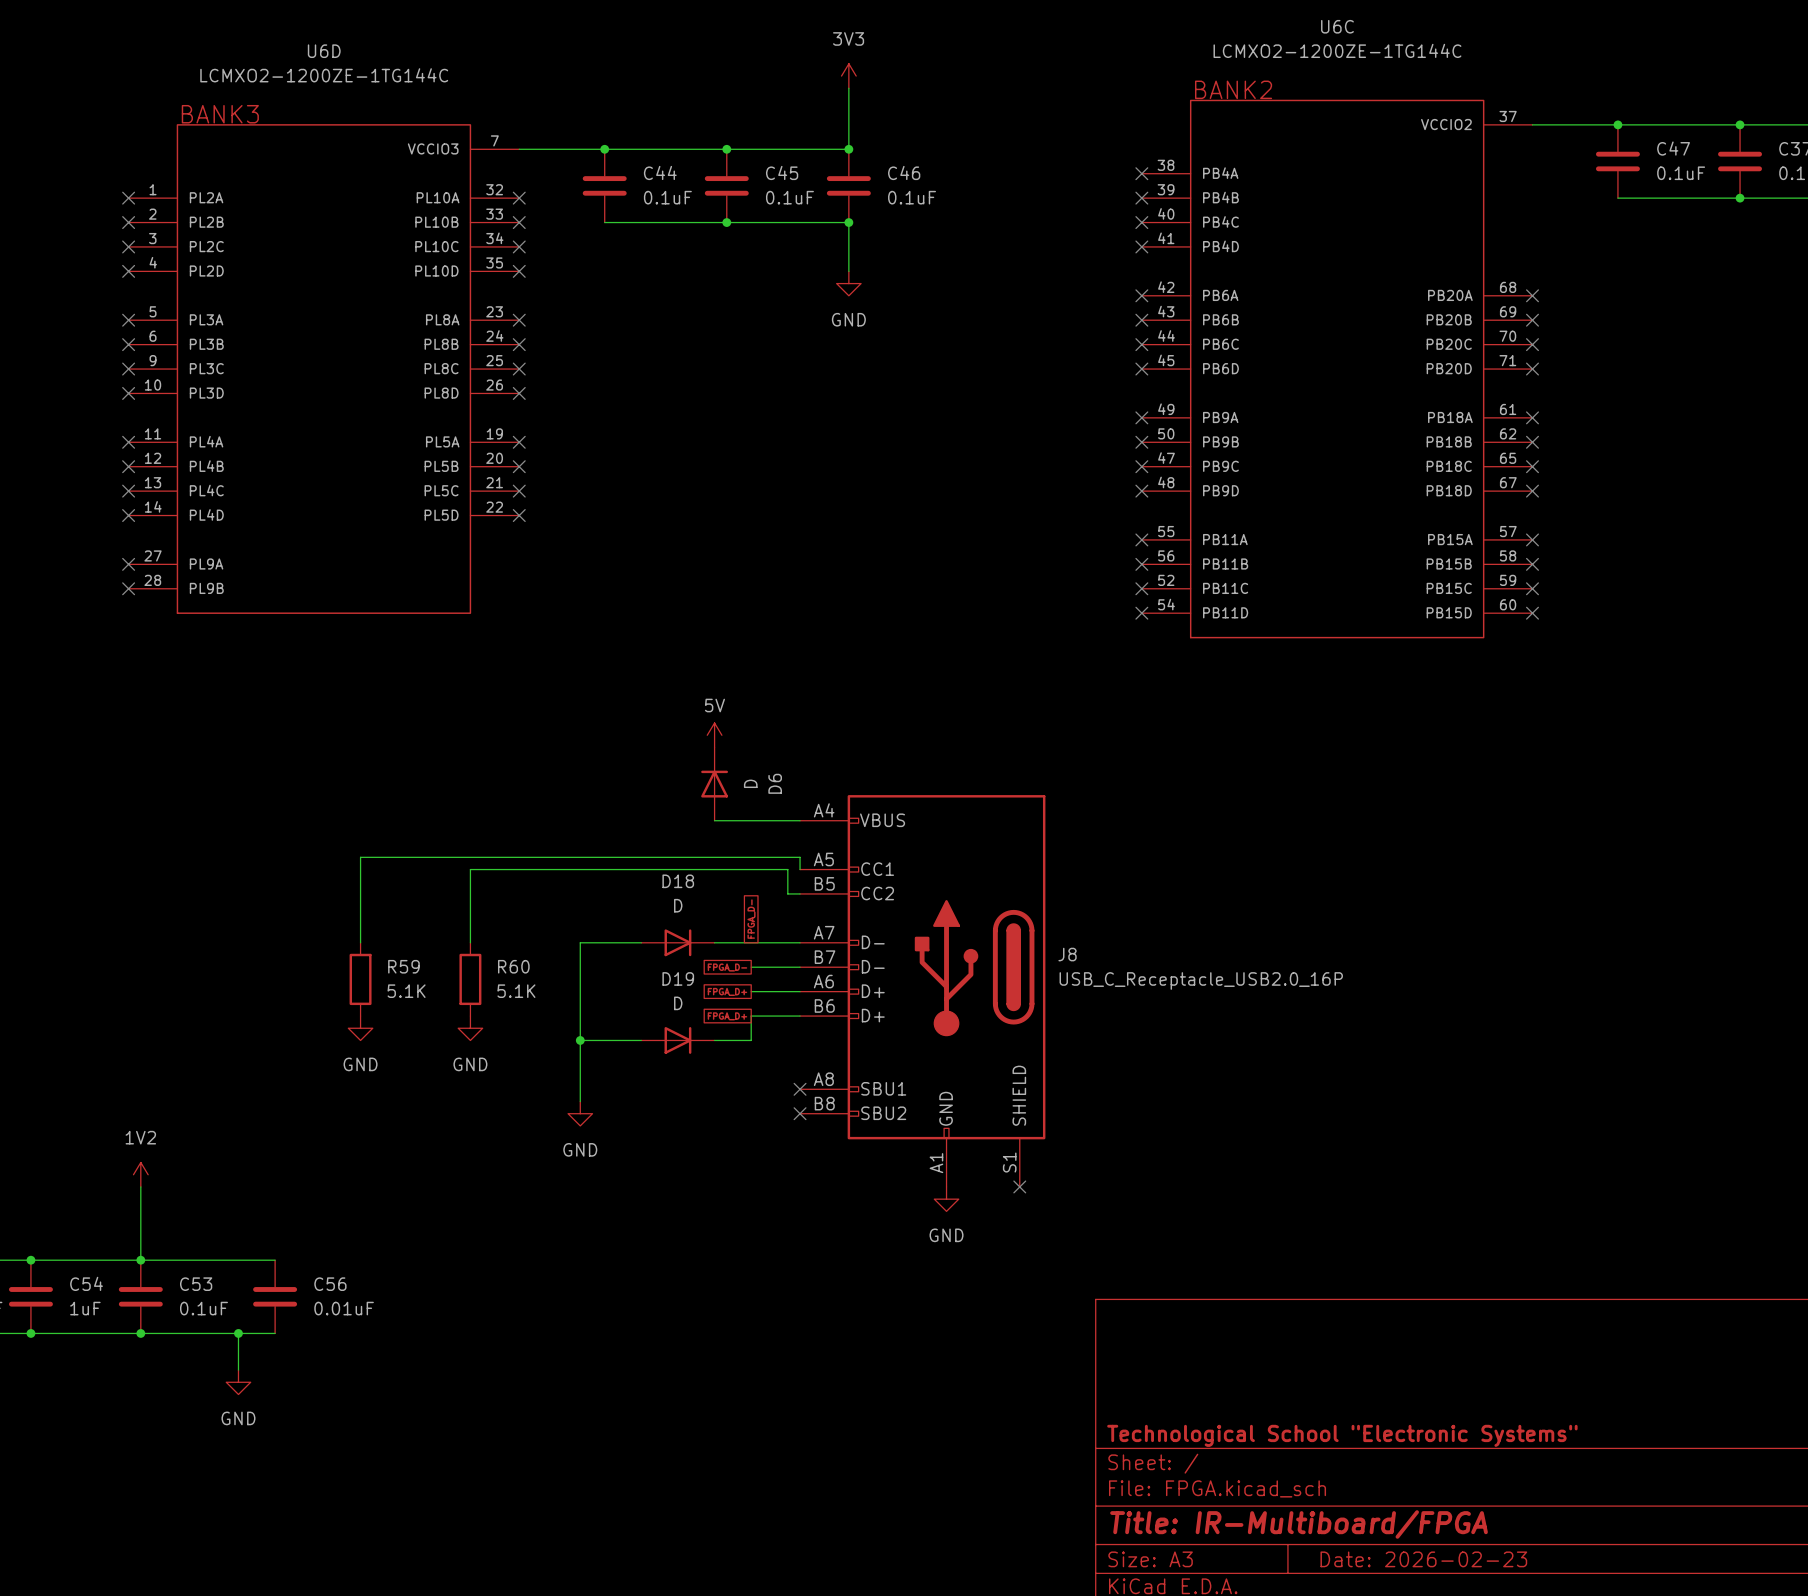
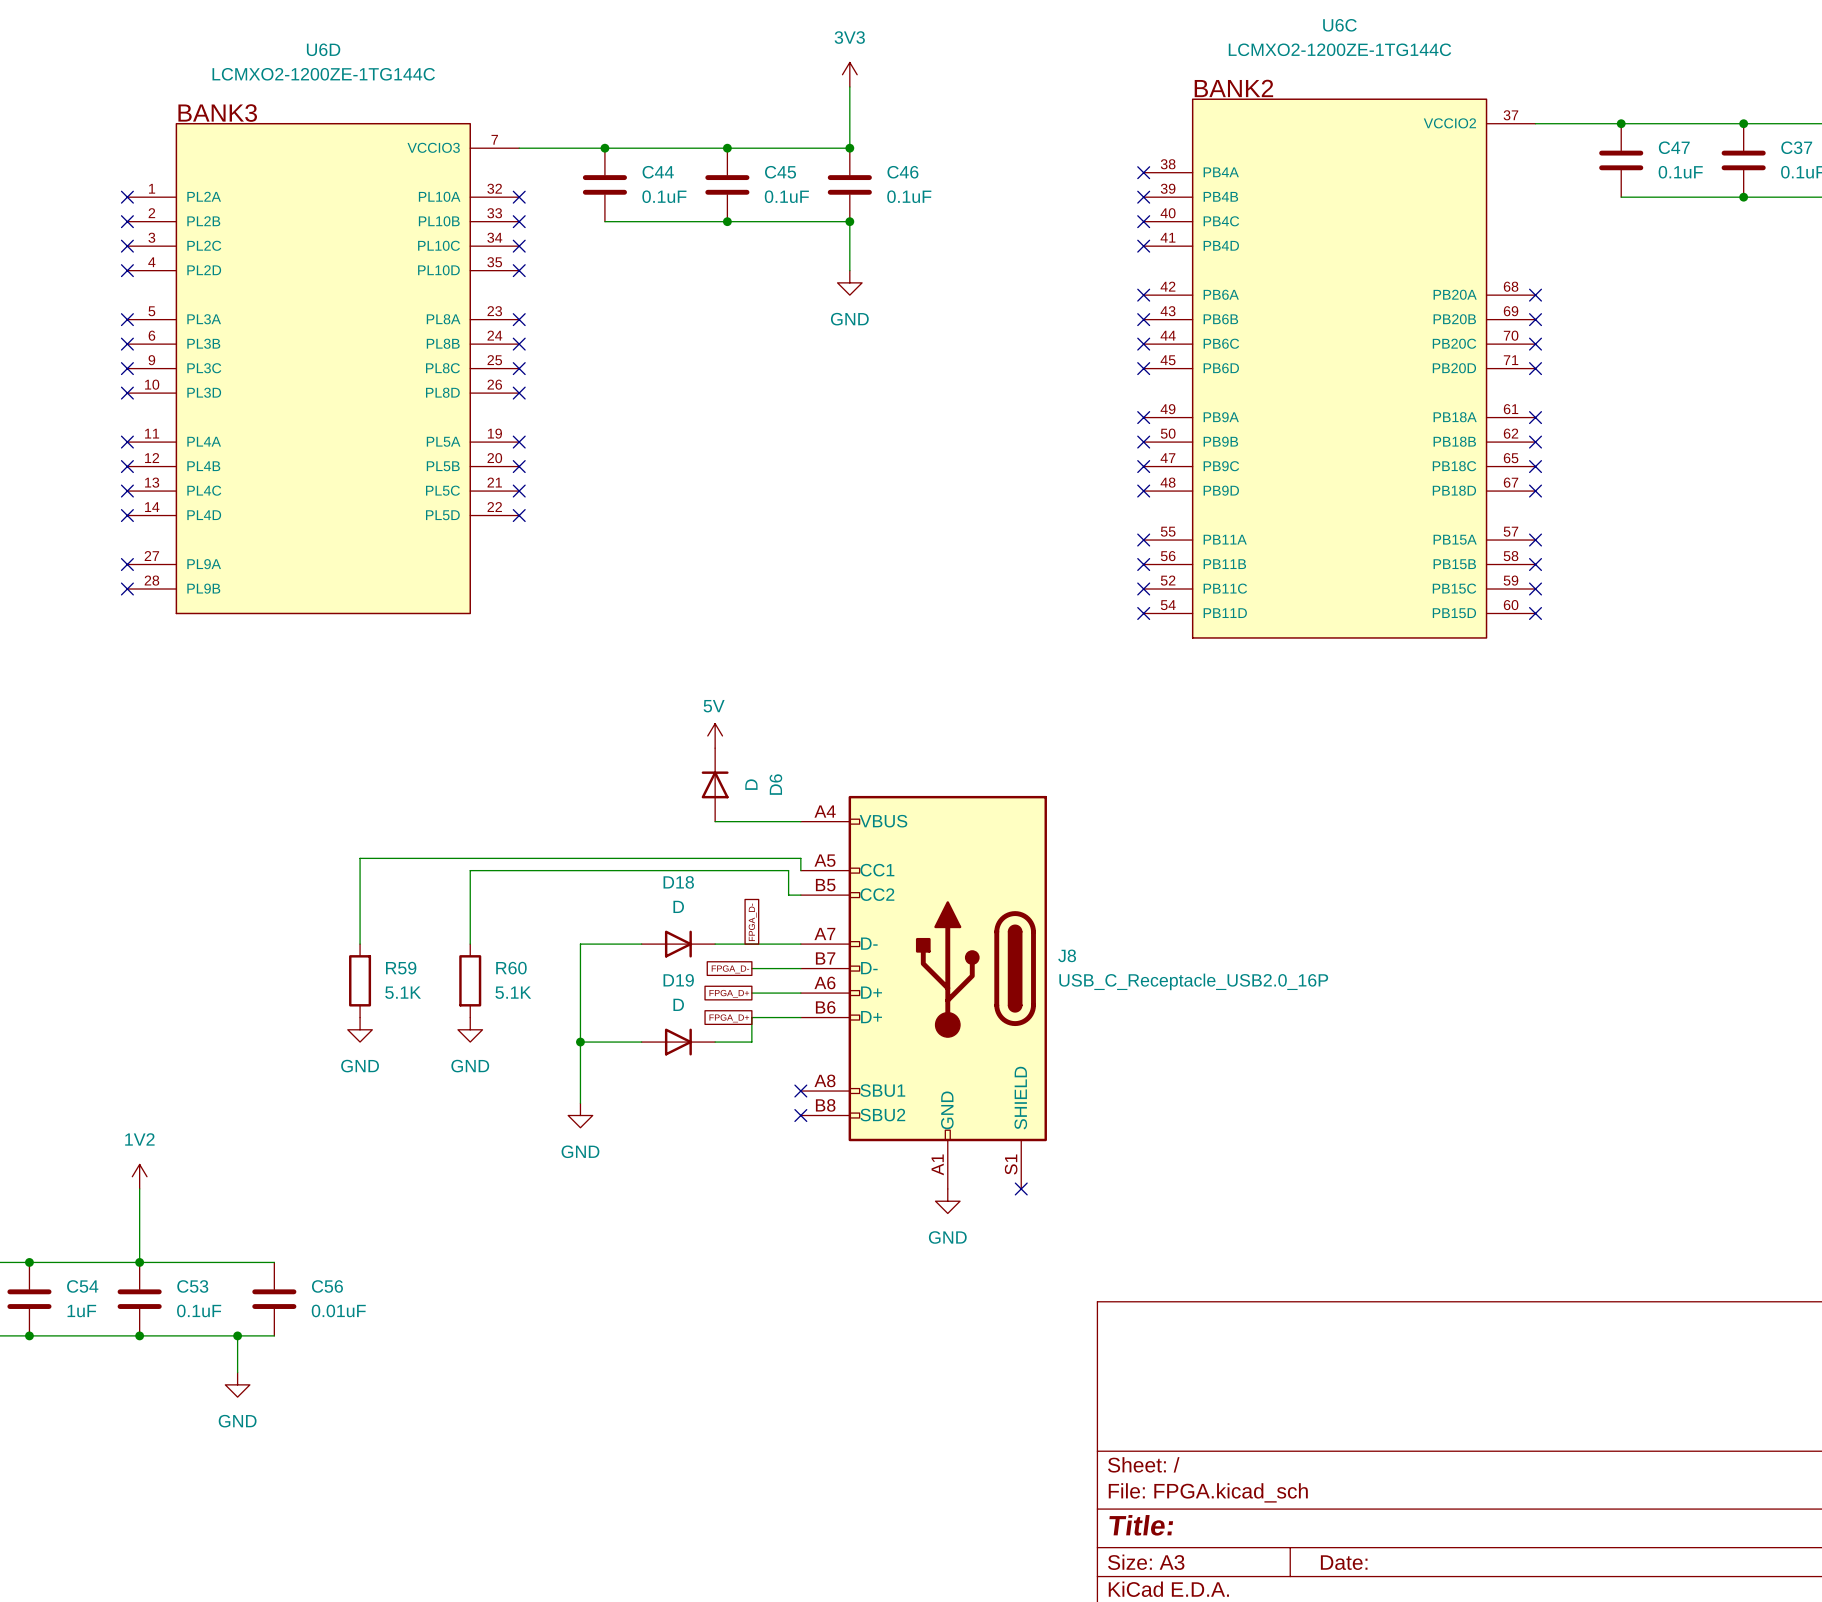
title block: Technological School "Electronic Systems" (1342, 1435) -> none
title block: Title: IR-Multiboard/FPGA (1299, 1524) -> Title: (1141, 1525)
title block: Date: 2026-02-23 (1423, 1559) -> Date: (1344, 1562)

